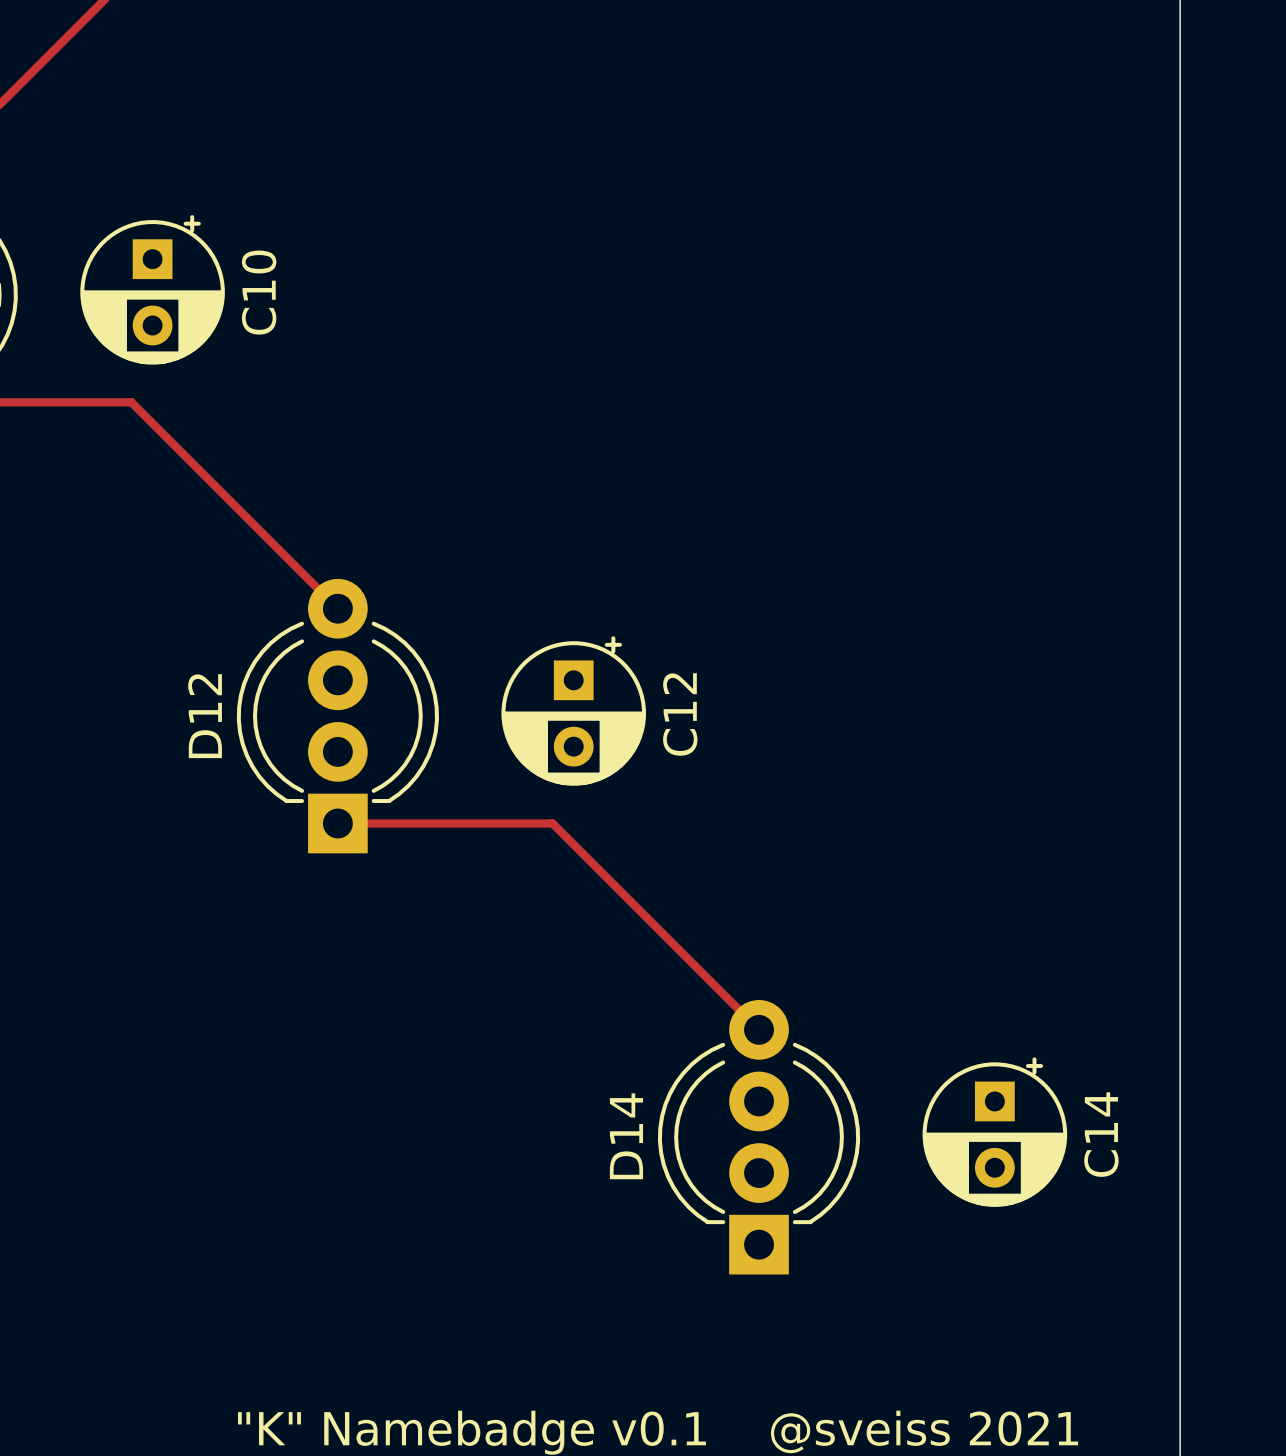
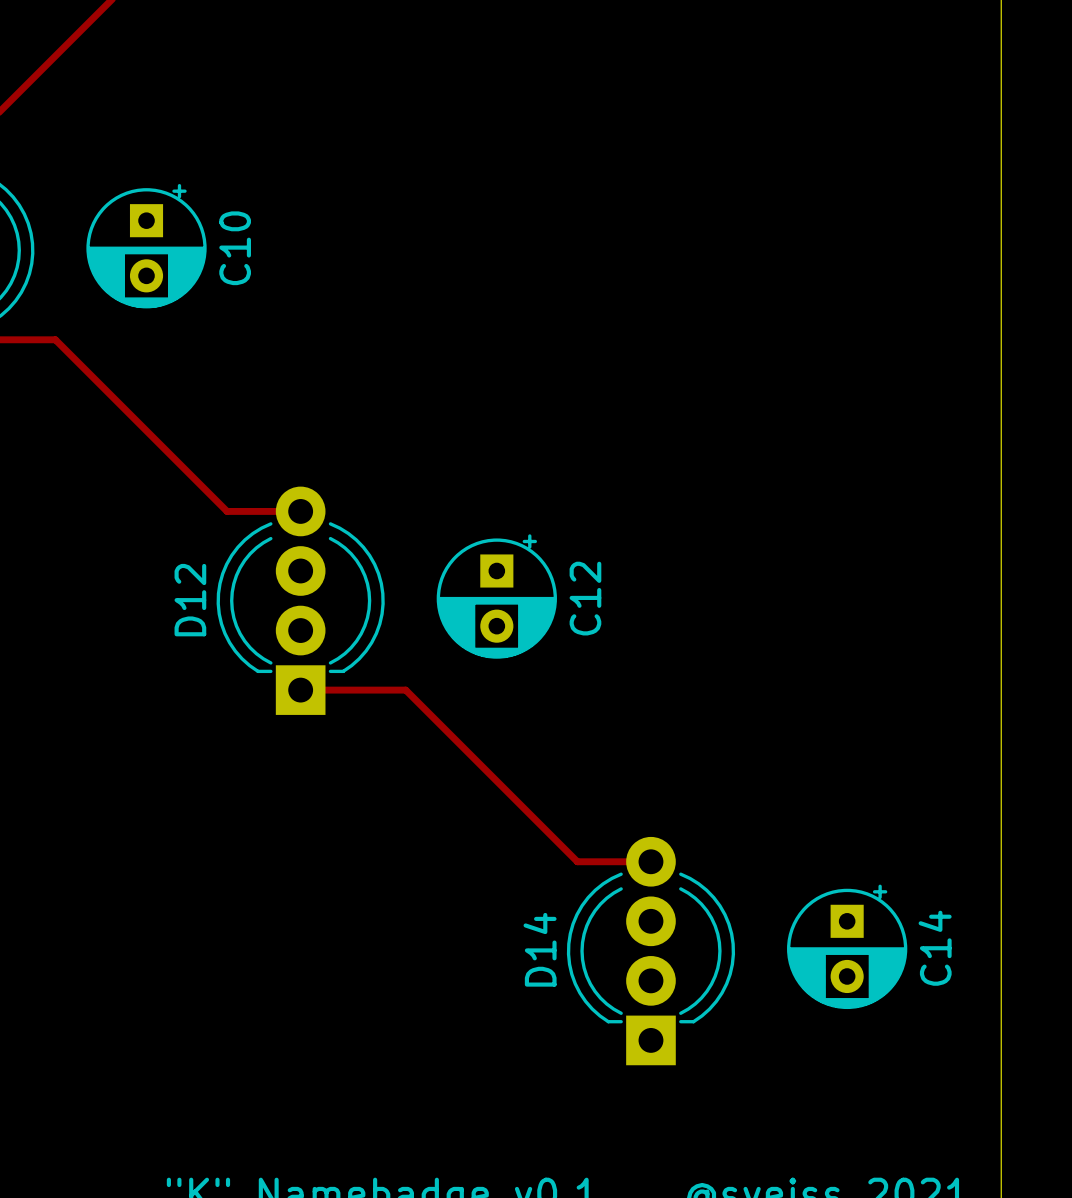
track: (43, 402) (131, 402) (337, 608) -> (55, 339) (227, 511) (300, 511)
track: (464, 823) (552, 823) (759, 1029) -> (405, 690) (577, 861) (650, 861)

